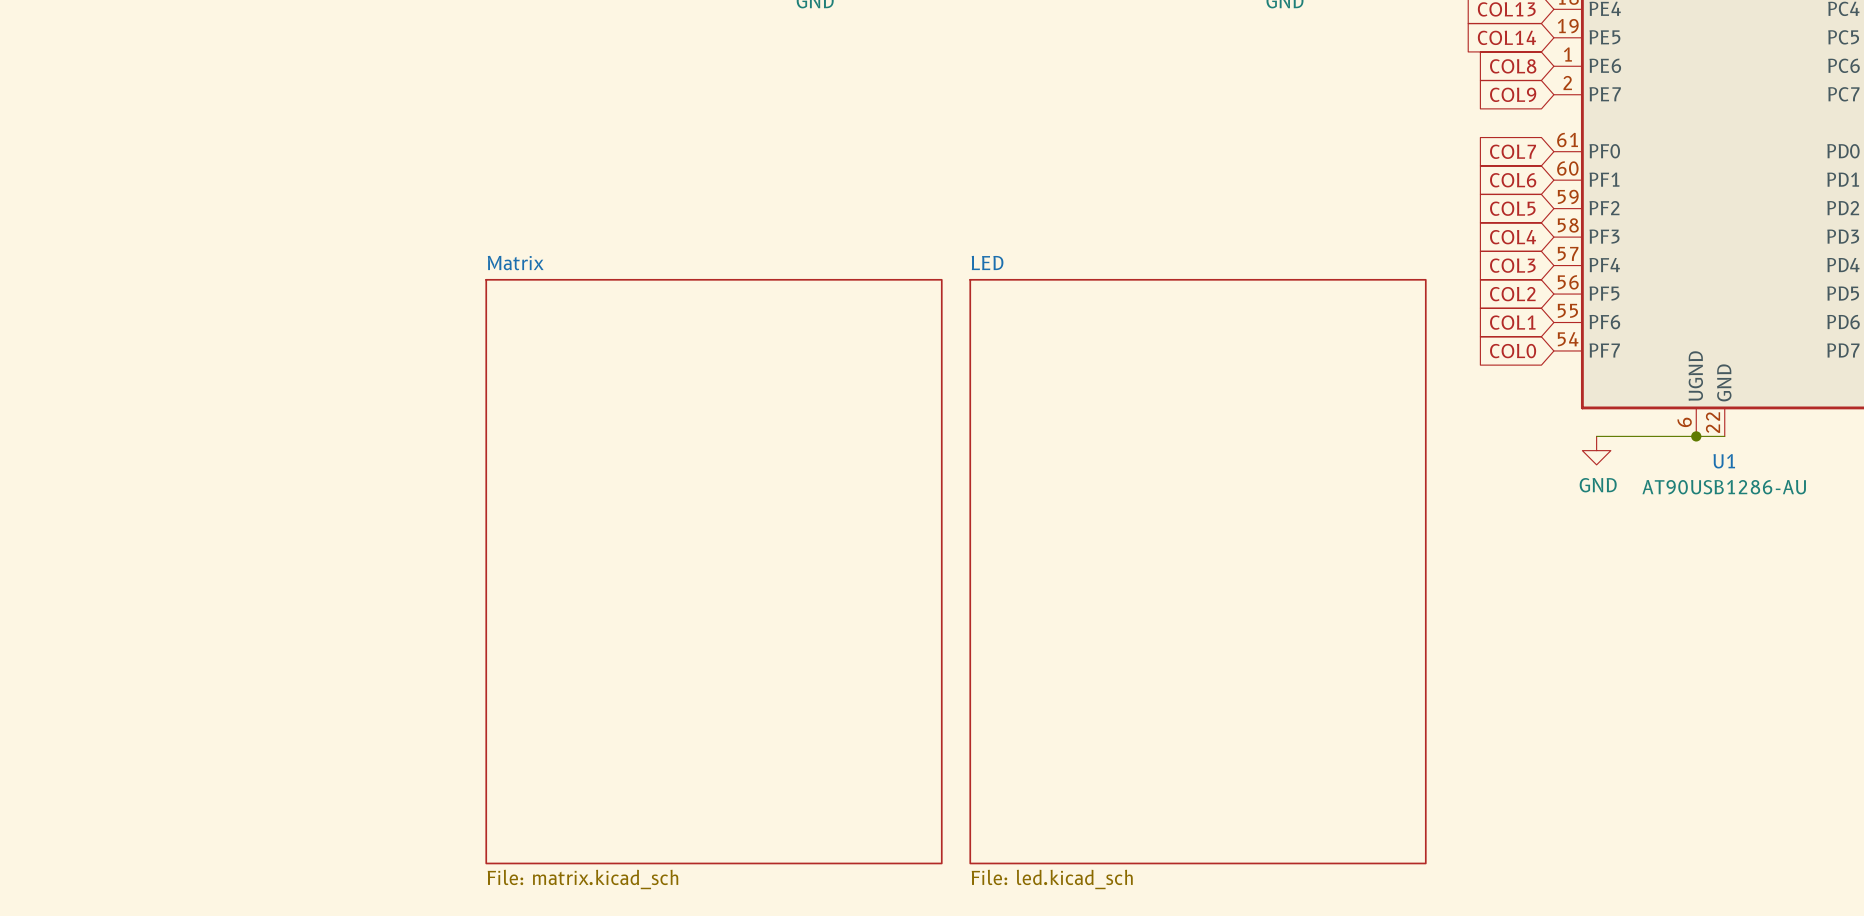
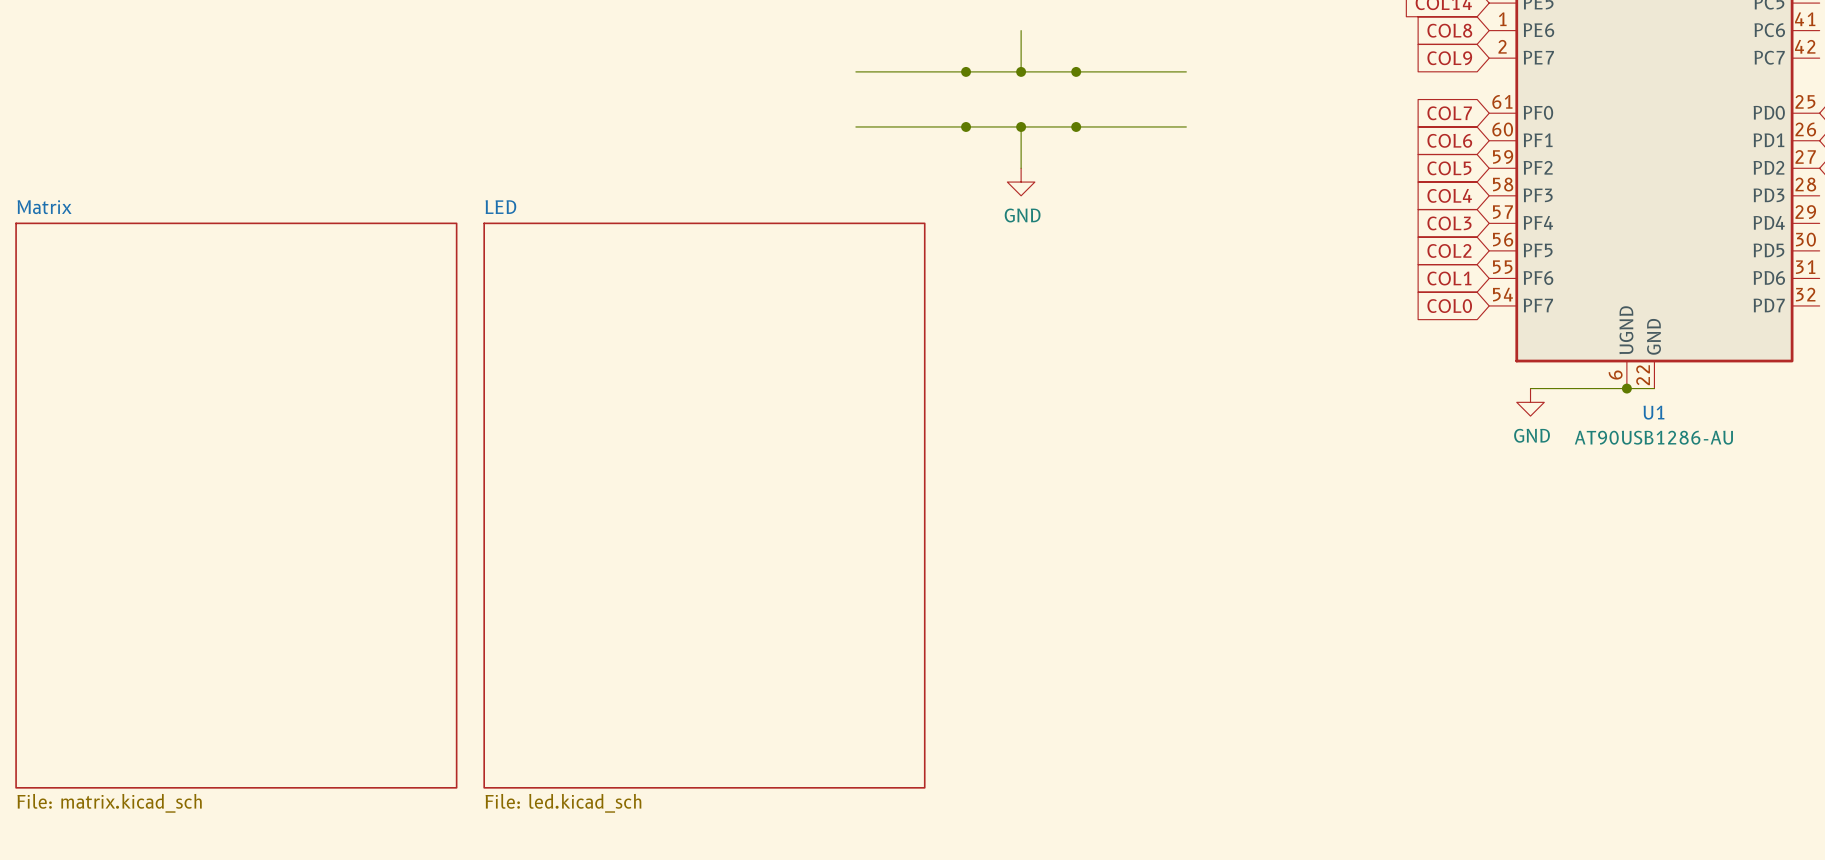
wire: none -> (1021, 30) (1021, 71)
wire: none -> (855, 71) (1186, 71)
junction: none -> (966, 71)
junction: none -> (1021, 71)
junction: none -> (1076, 71)
wire: none -> (855, 126) (1186, 126)
junction: none -> (966, 126)
wire: none -> (1021, 126) (1021, 168)
junction: none -> (1021, 126)
junction: none -> (1076, 126)
power symbol: none -> GND (1021, 182)
sheet Matrix: none -> File: matrix.kicad_sch (236, 505)
sheet LED: none -> File: led.kicad_sch (704, 505)
sheet Matrix: File: matrix.kicad_sch (714, 571) -> none
sheet LED: File: led.kicad_sch (1198, 571) -> none

